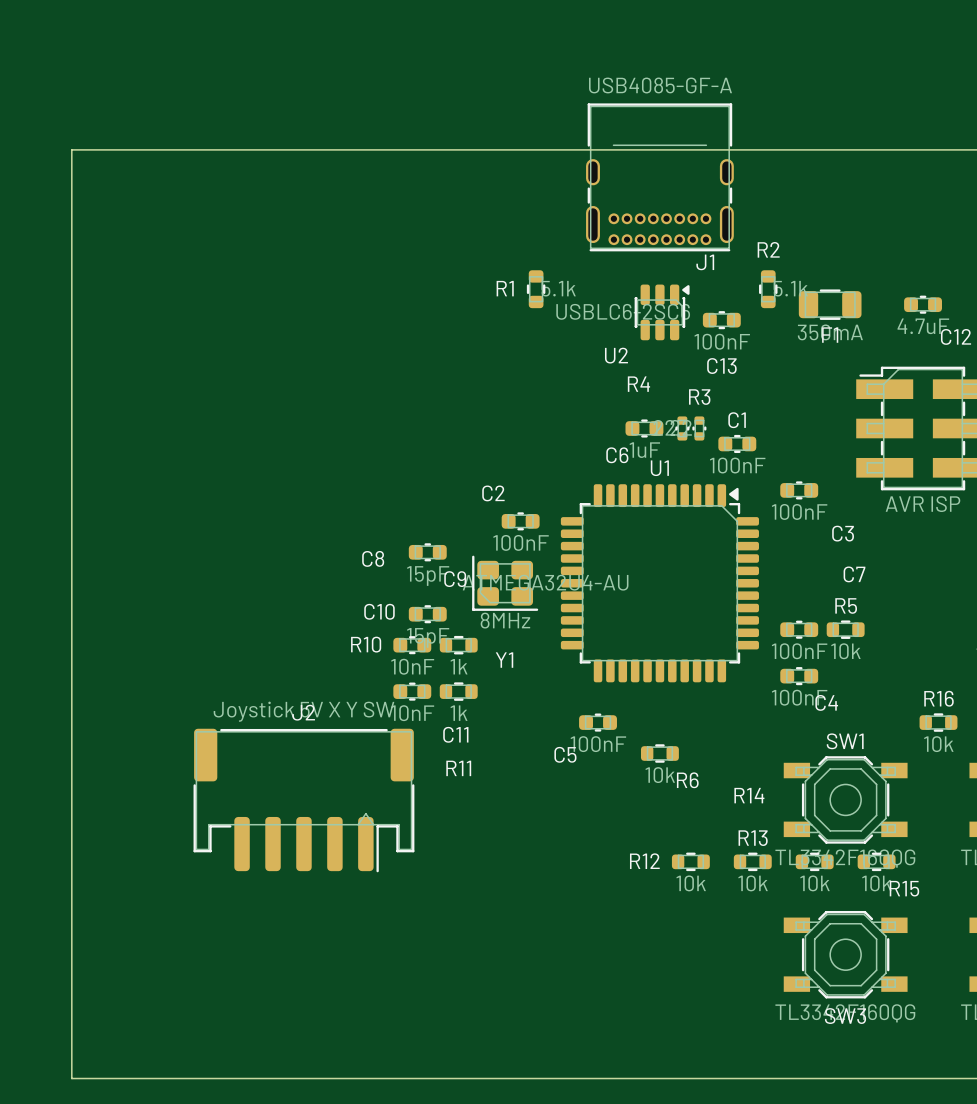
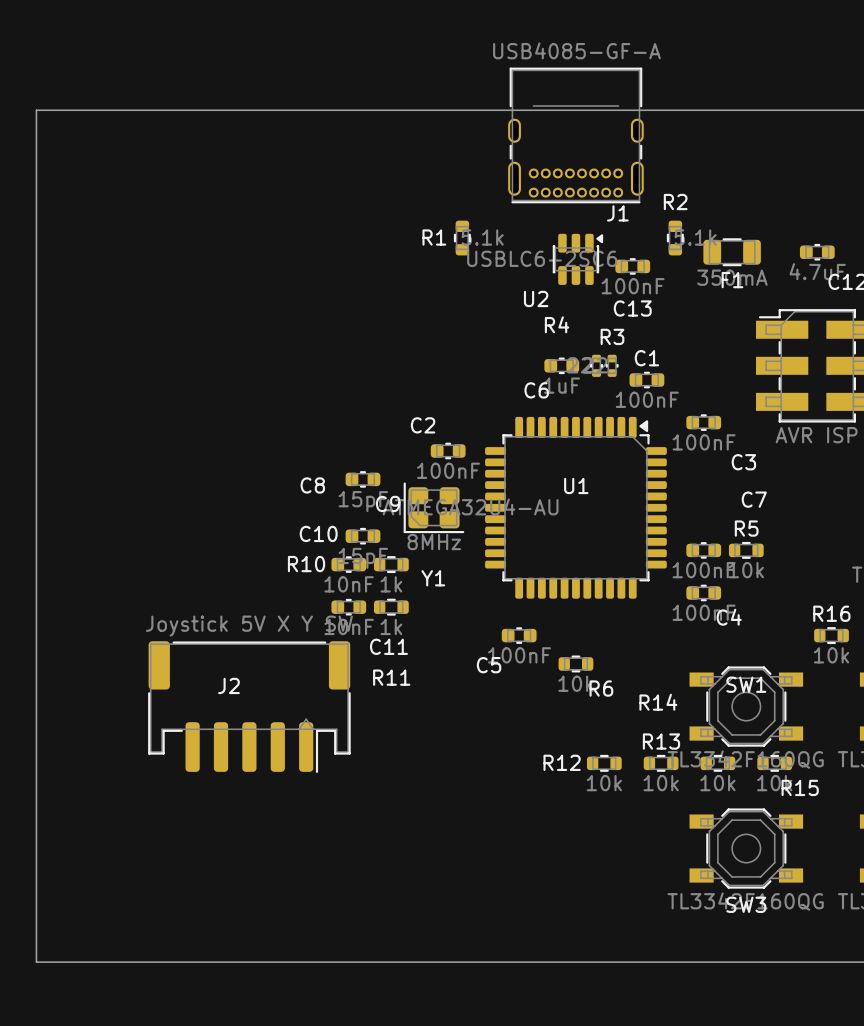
U1 name position: U1 (659, 468) -> U1 (576, 485)
J2 name position: J2 (303, 712) -> J2 (228, 685)
SW1 name position: SW1 (845, 741) -> SW1 (746, 684)

